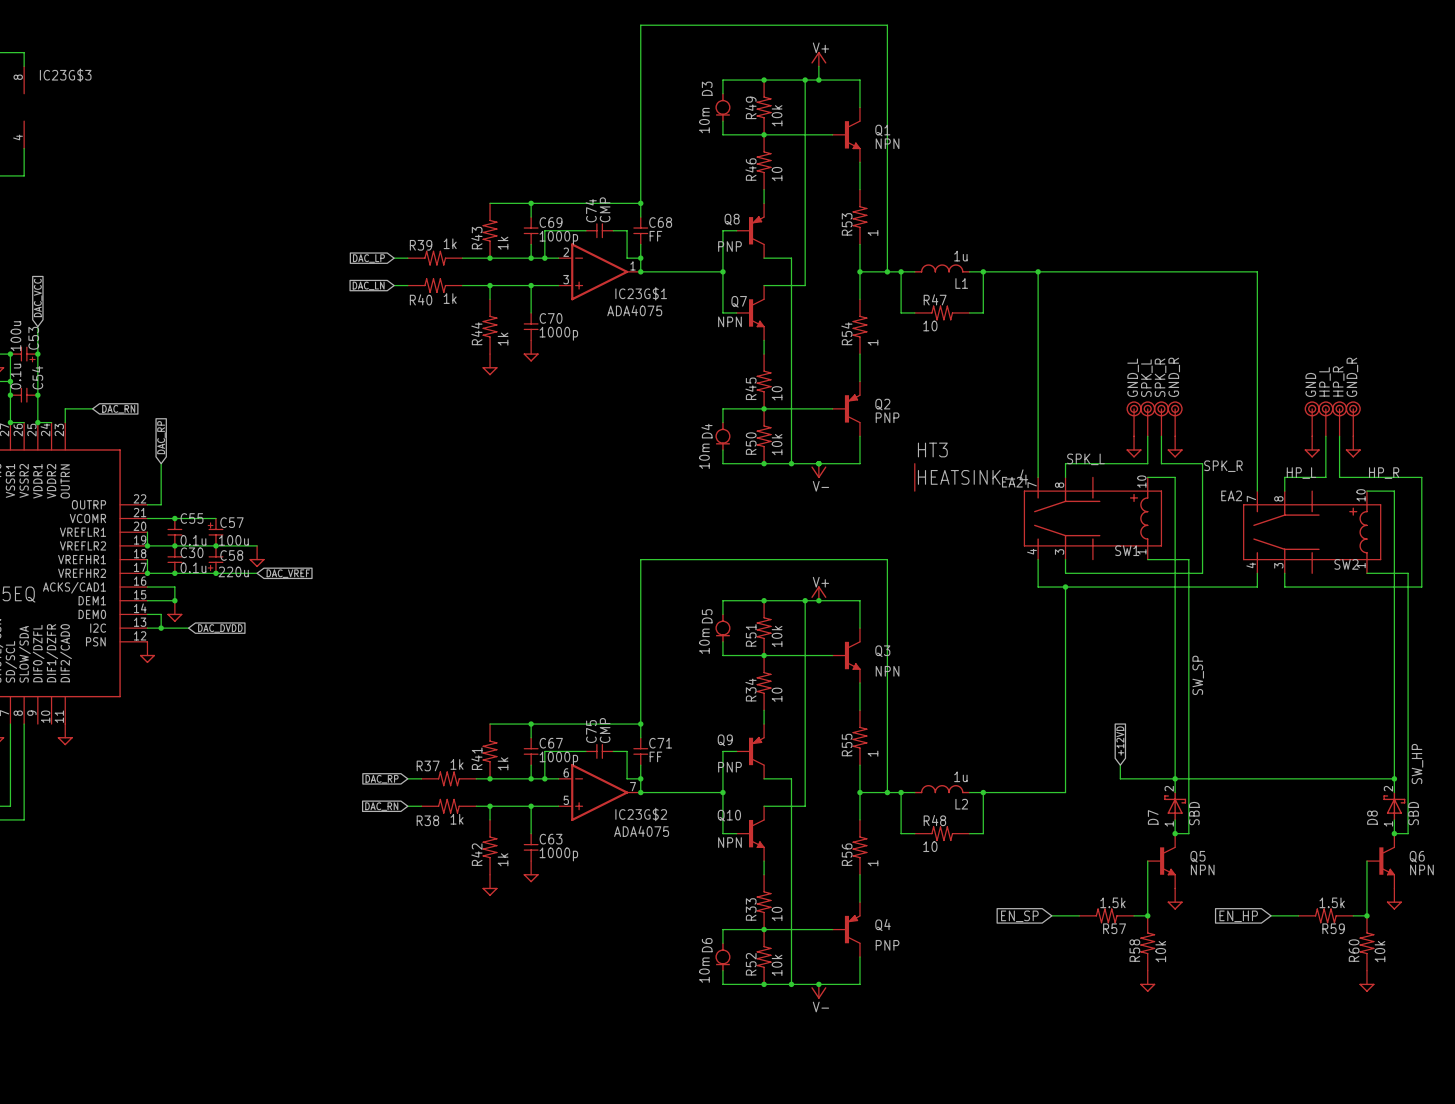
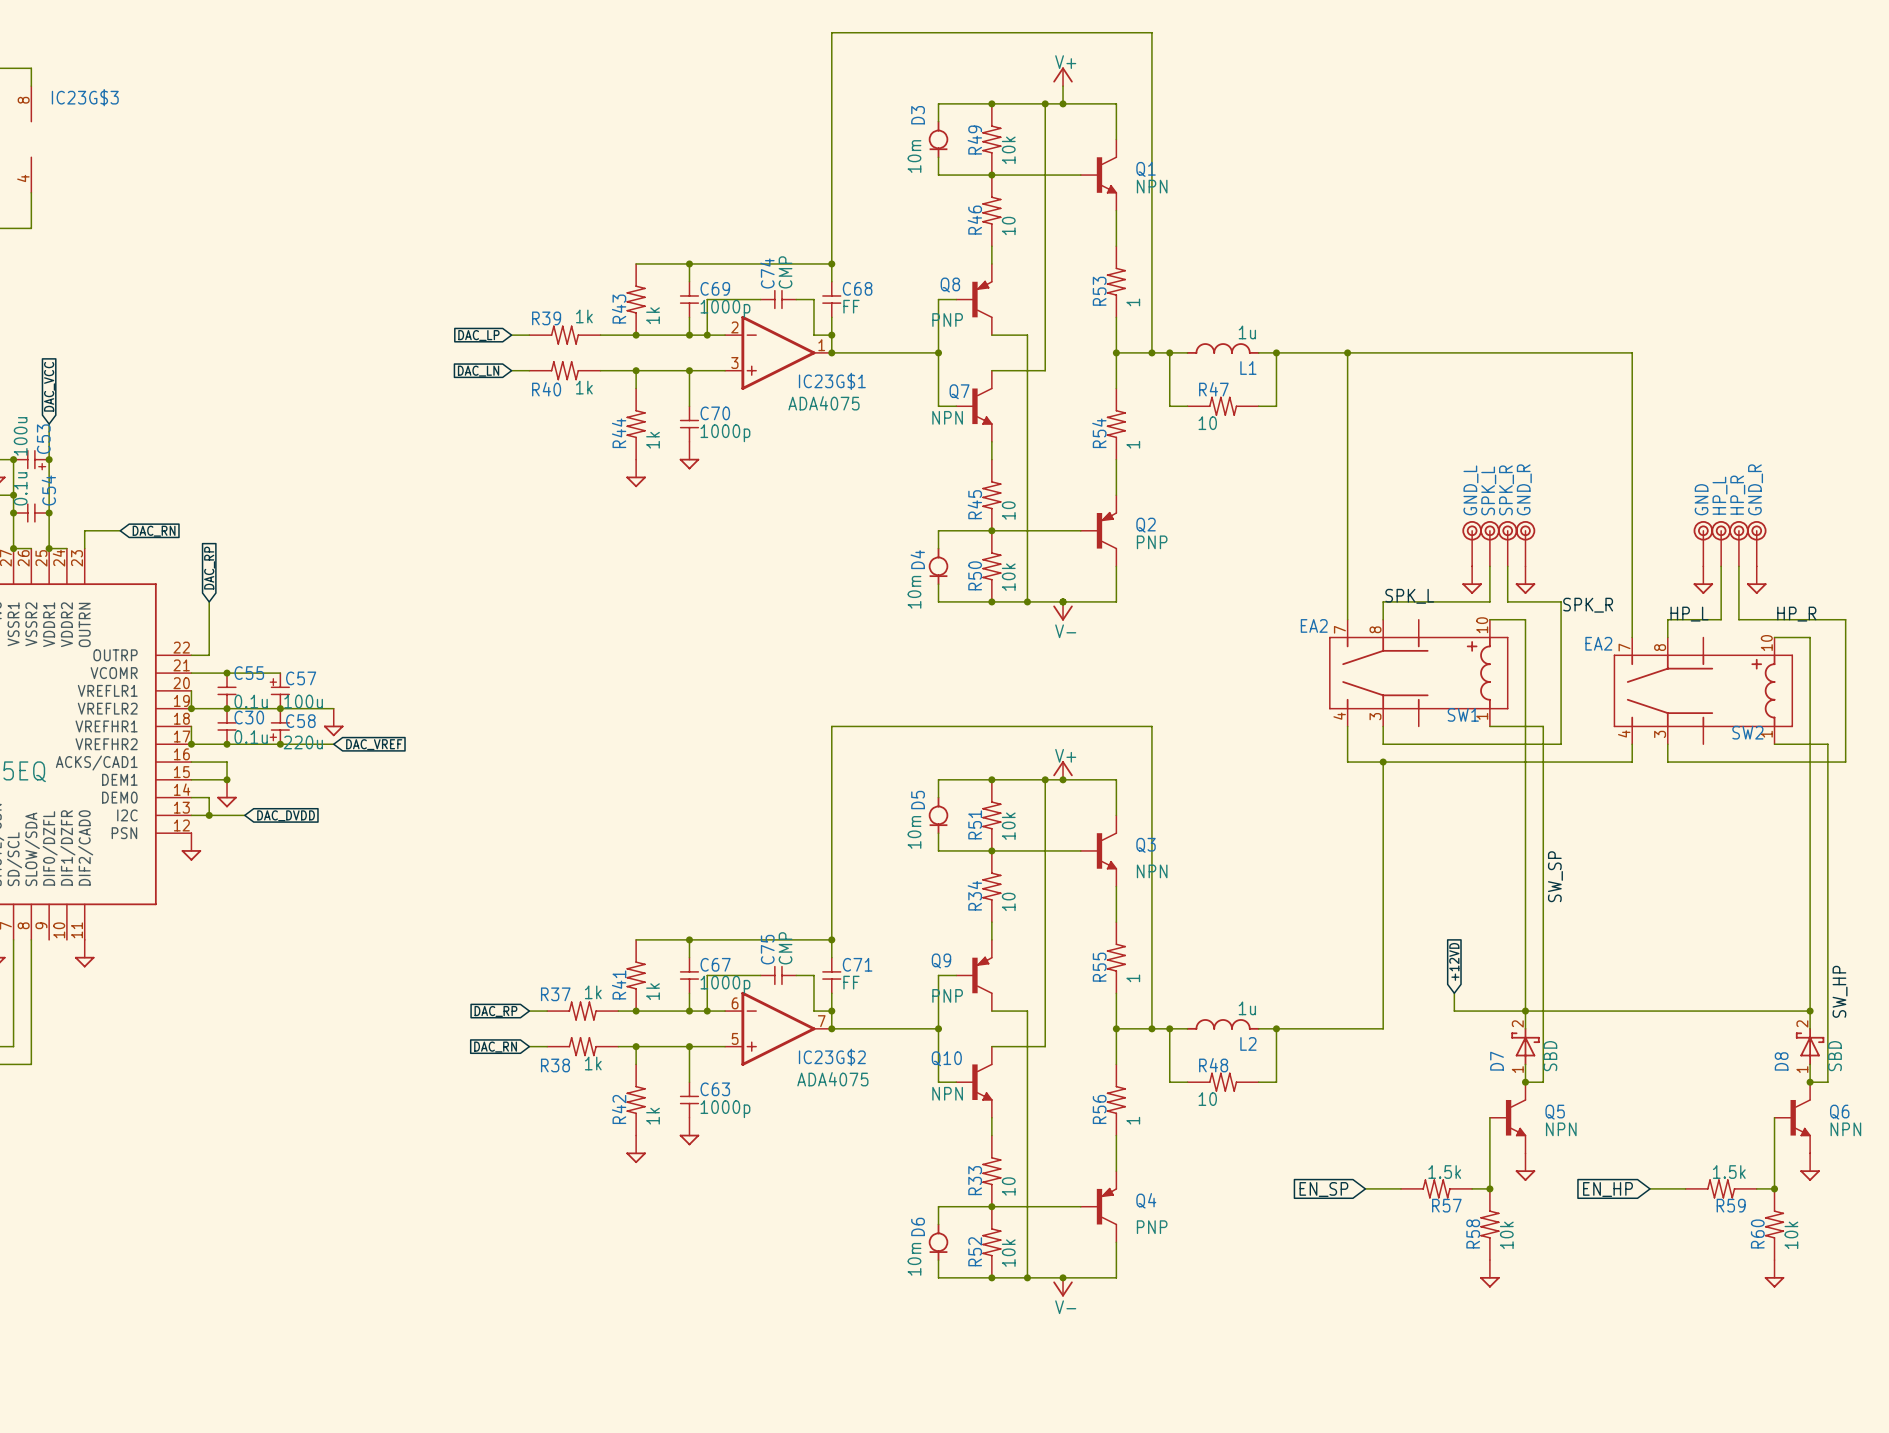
HT3: HEATSINK-4 (914, 477) -> none

